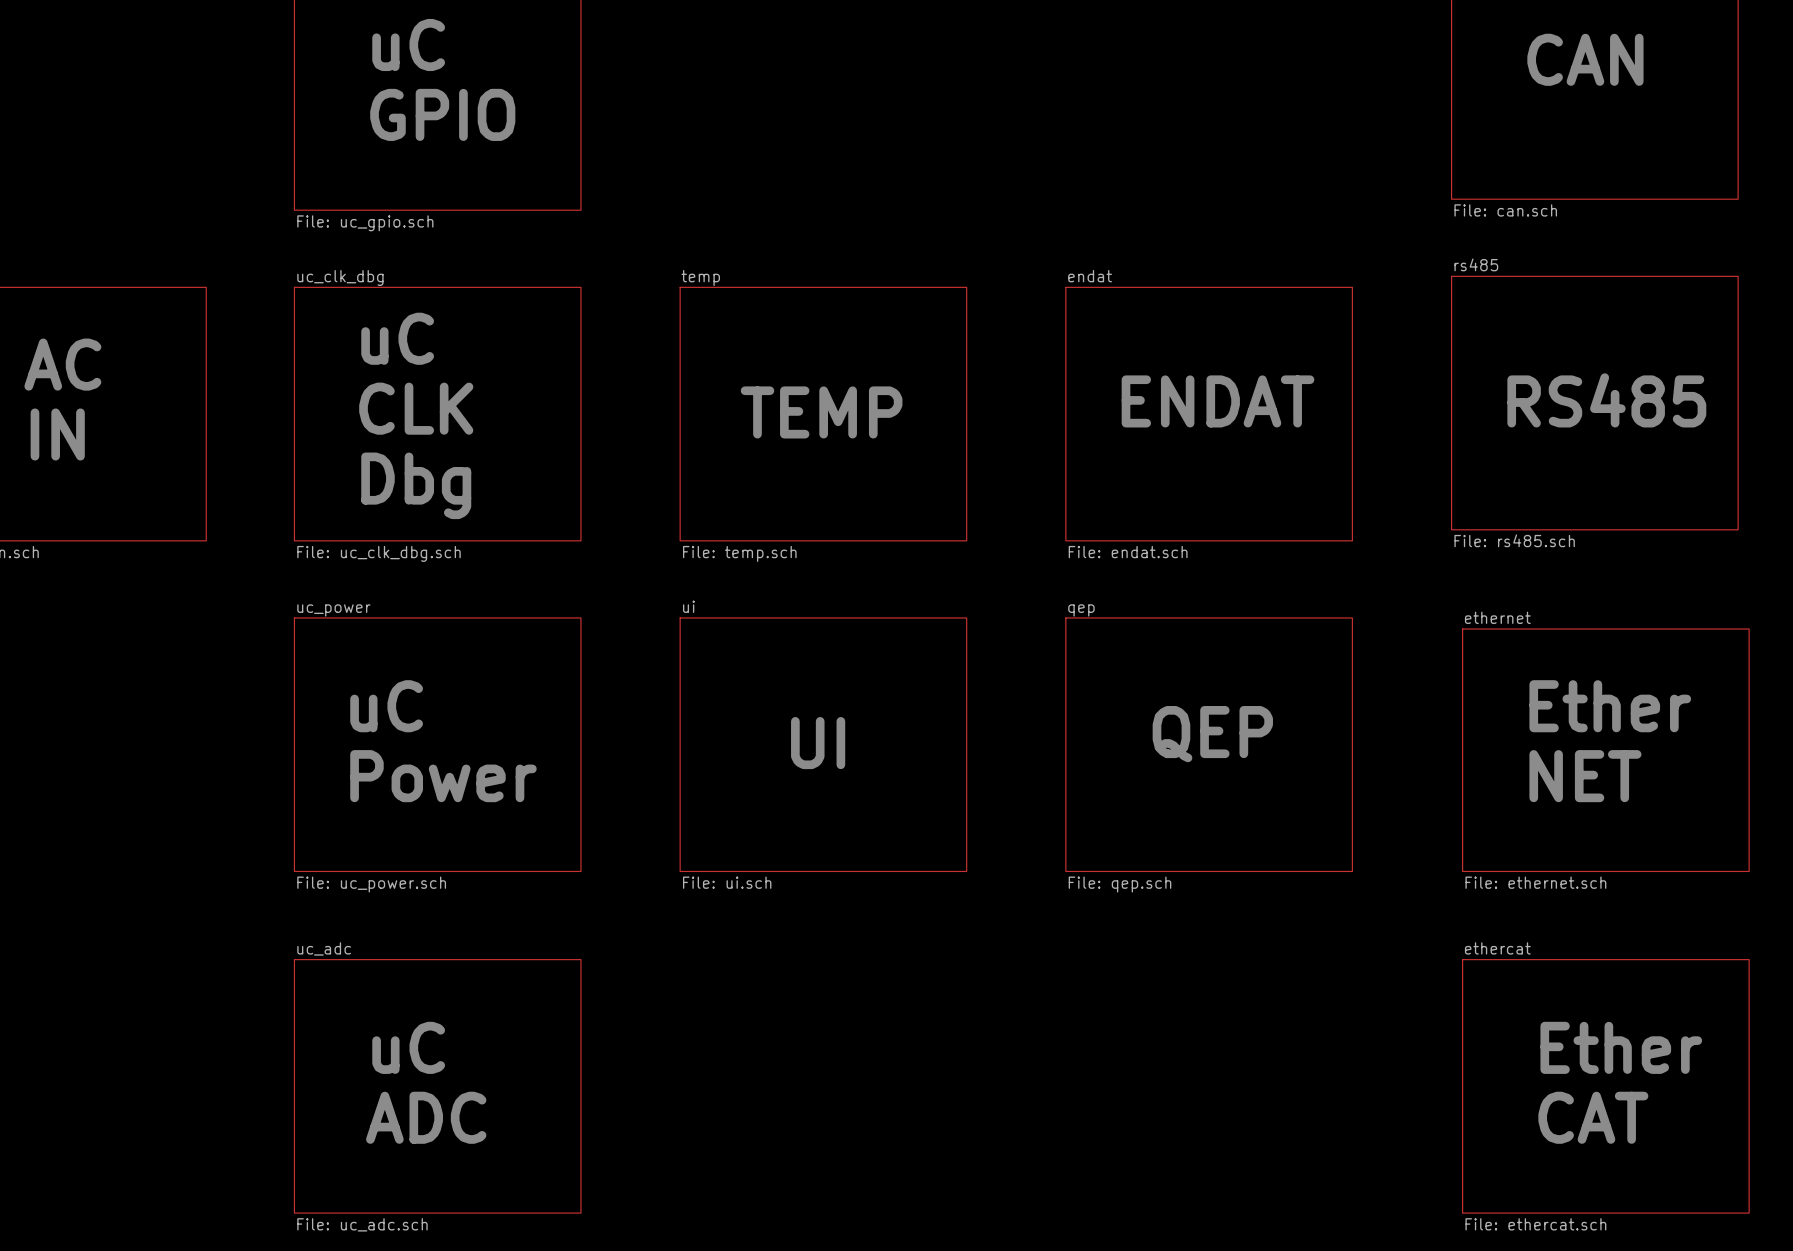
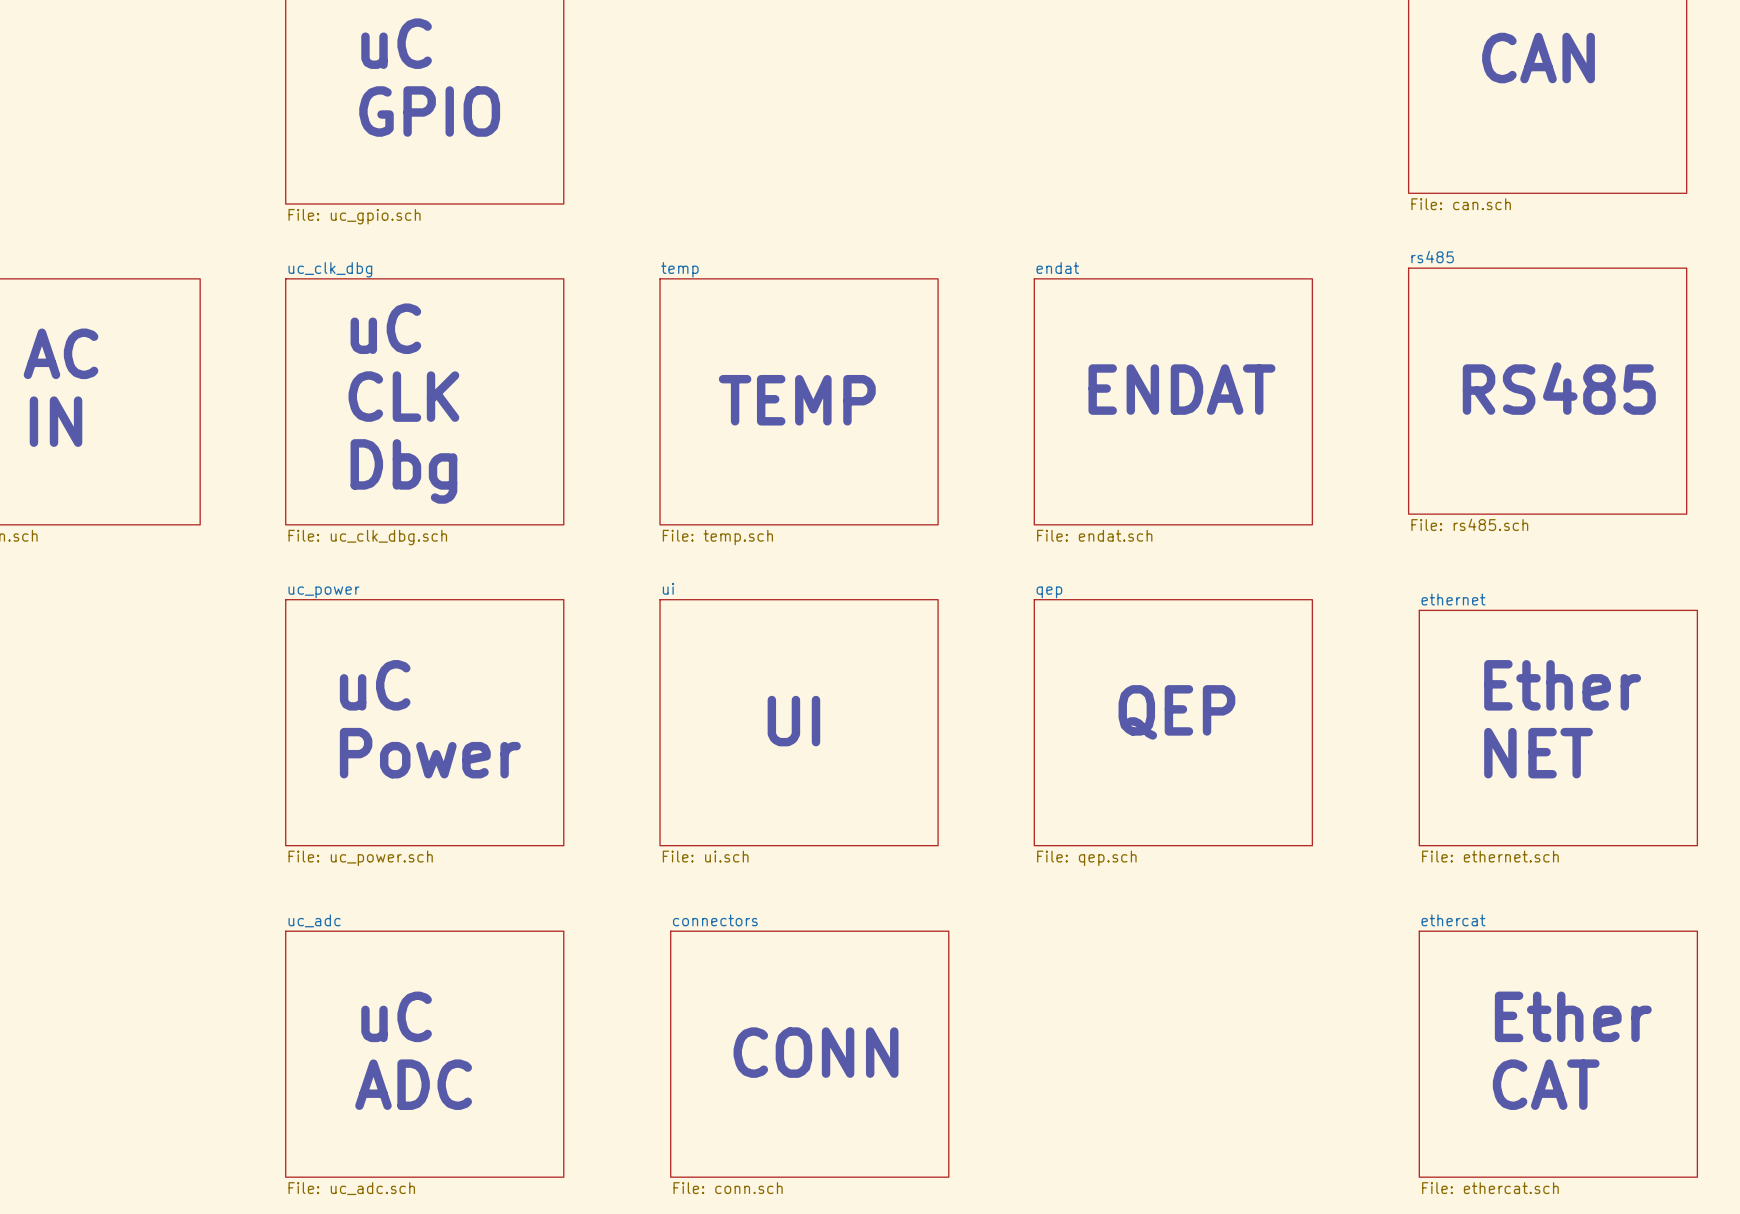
text: none -> CONN (816, 1052)
sheet connectors: none -> File: conn.sch (809, 1054)

